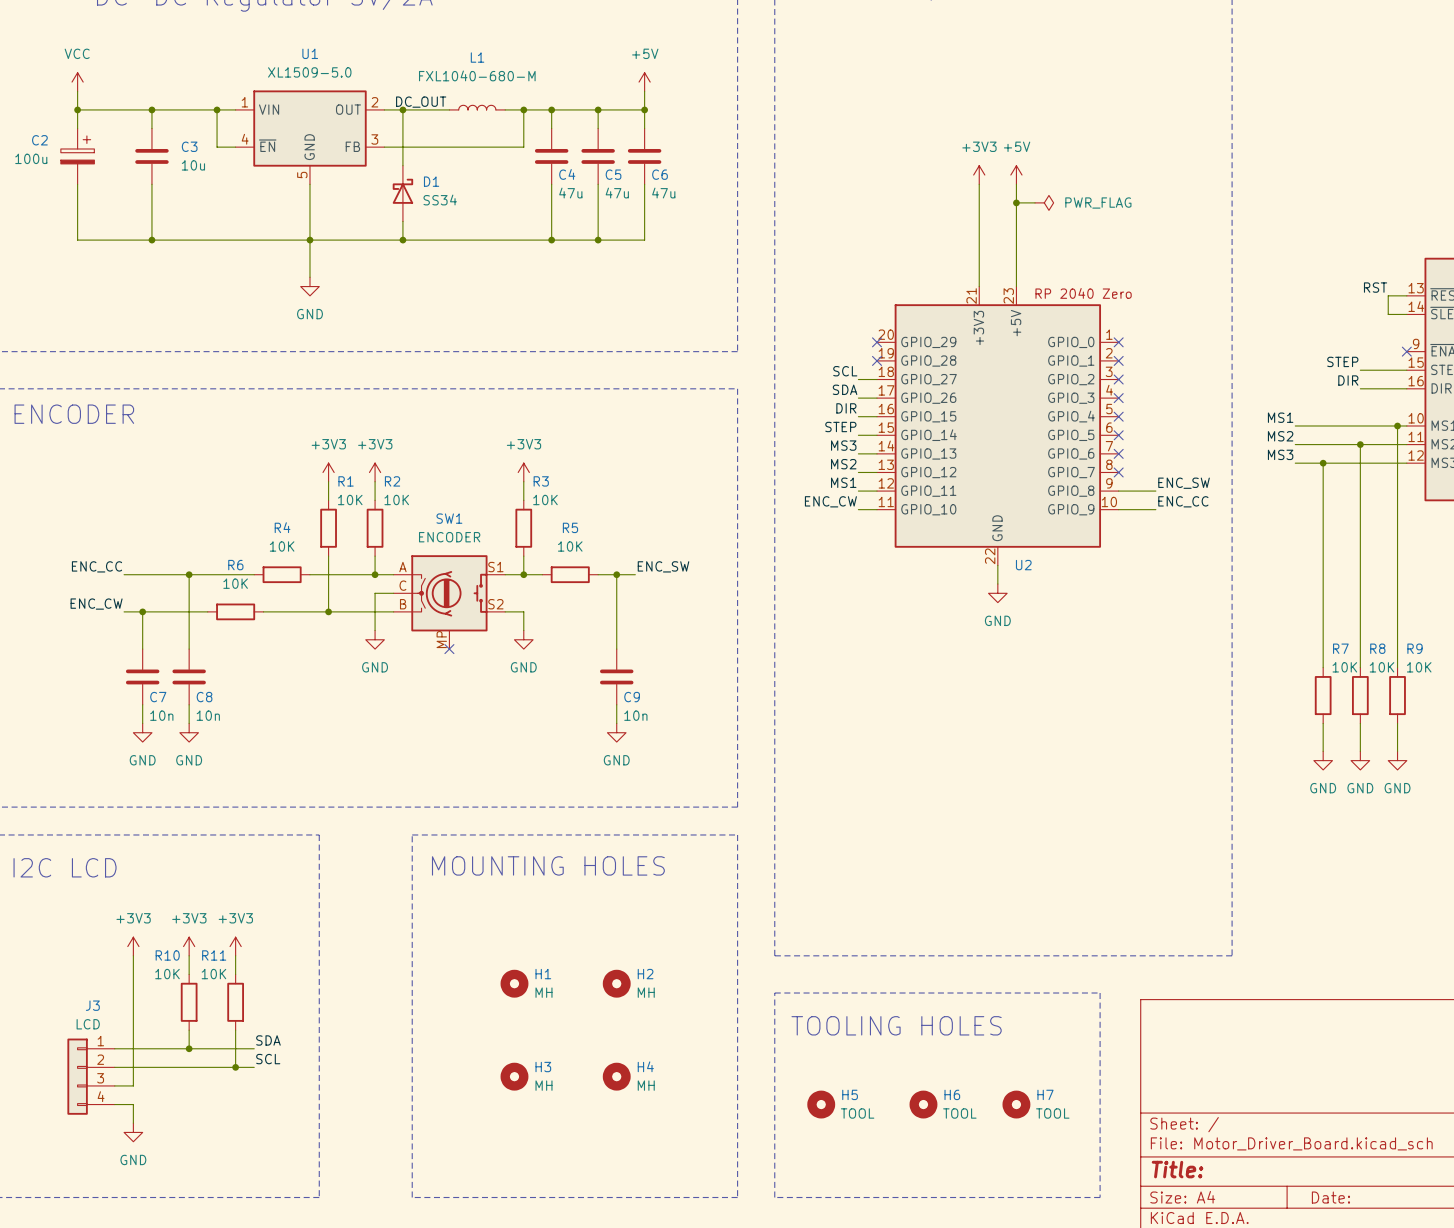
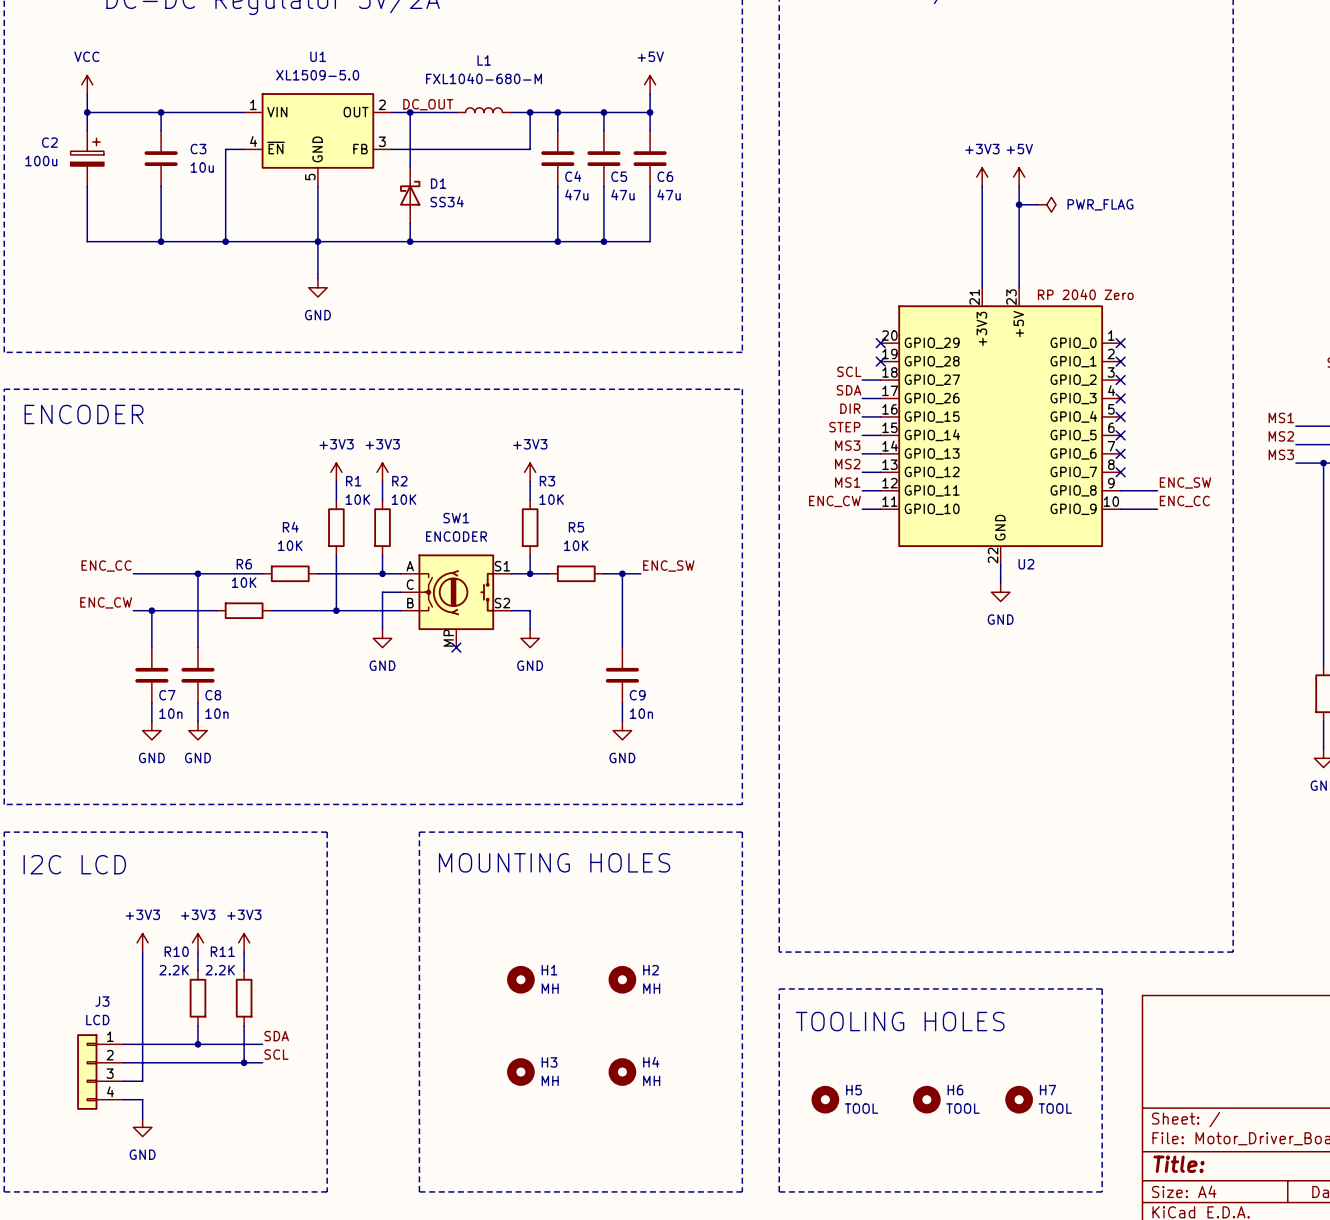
wire: (217, 109) (217, 147) -> (225, 241) (225, 149)
junction: (217, 109) -> none
junction: none -> (225, 241)
R10 value: 10K (167, 974) -> 2.2K (174, 970)
R11 value: 10K (213, 974) -> 2.2K (220, 970)

